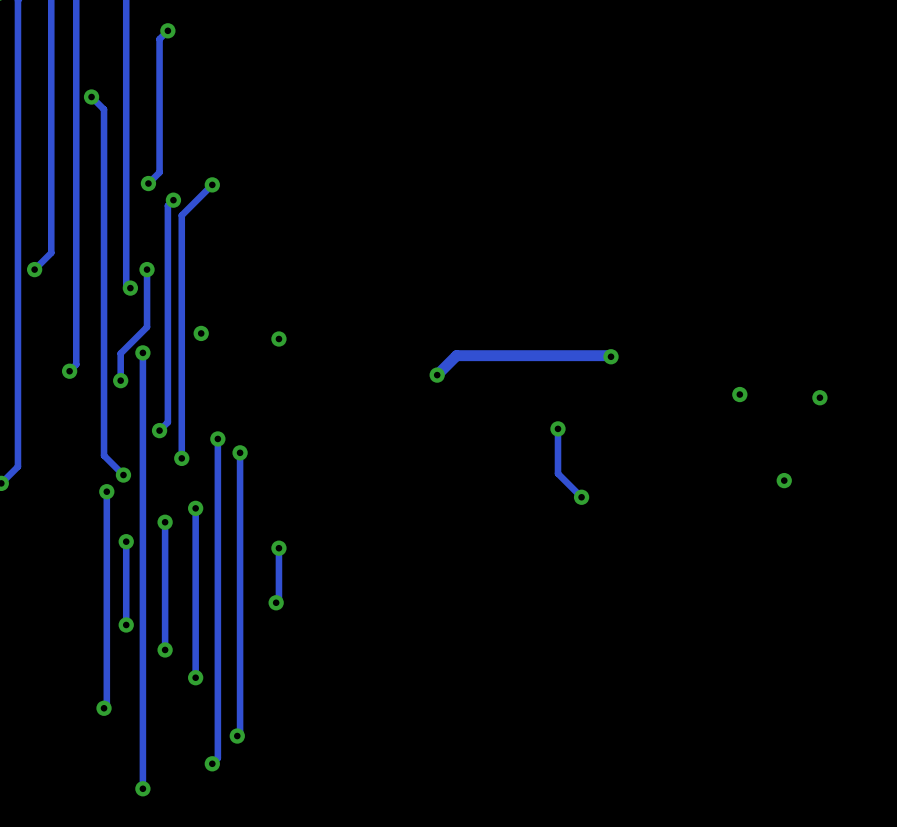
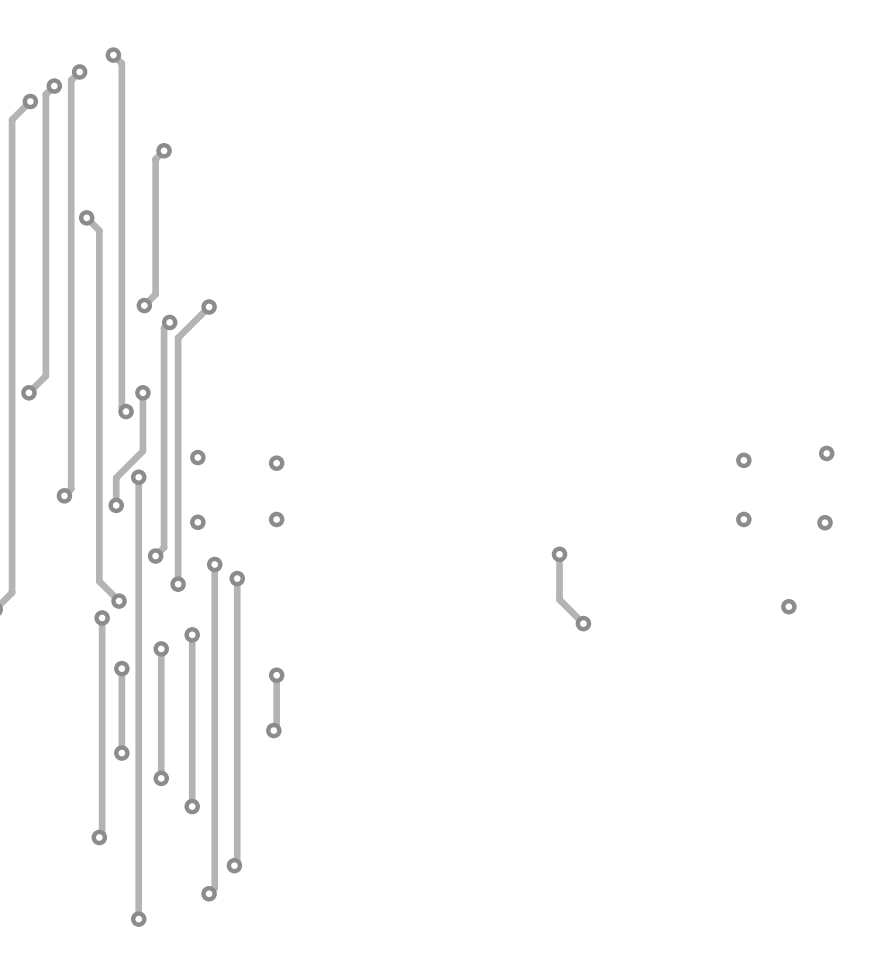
via: none -> (826, 453)
via: none -> (743, 460)
track: (611, 356) (456, 355) (437, 375) -> none
via: (611, 356) -> none
via: (437, 375) -> none
via: none -> (276, 519)
via: none -> (197, 522)

